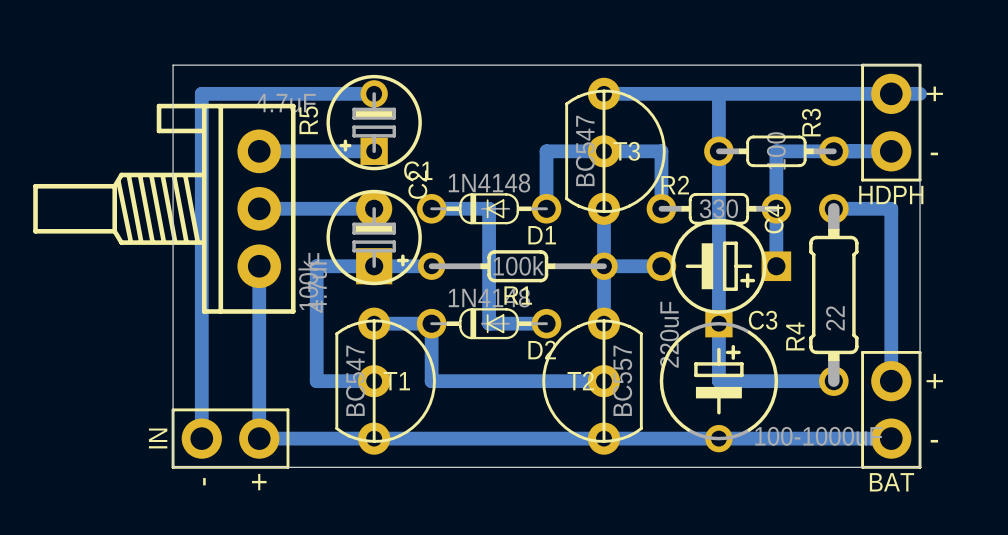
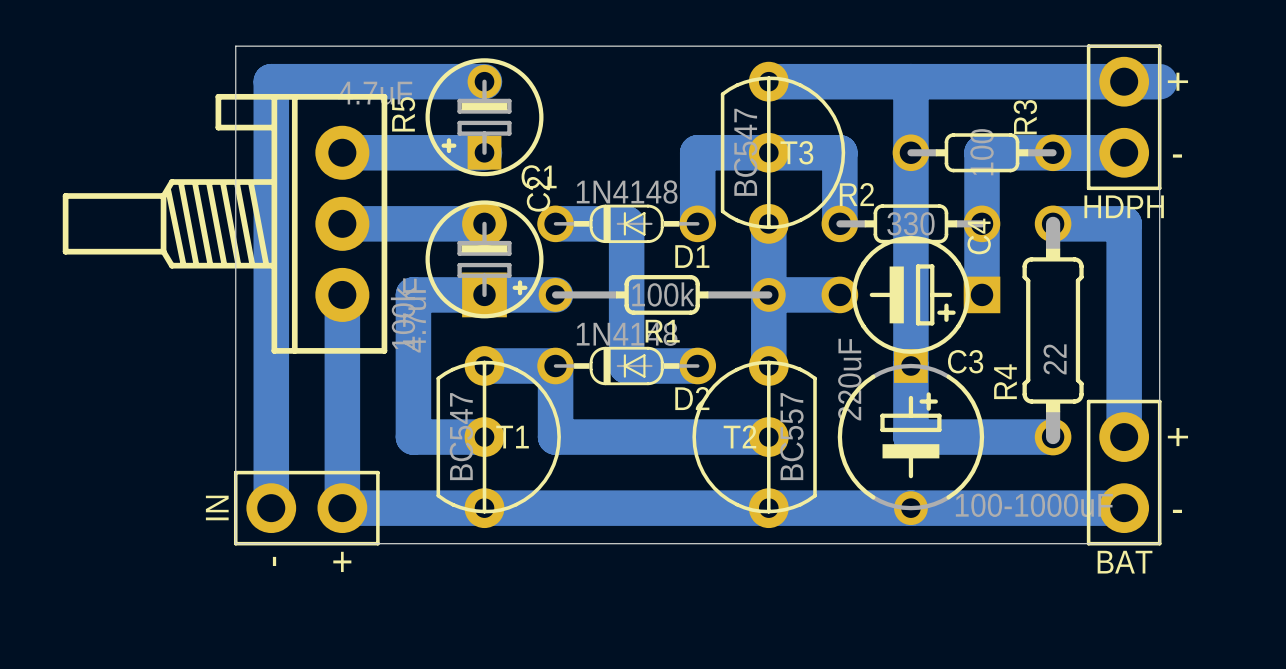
bottom track width: thin (374, 93) (201, 93) (201, 438) -> thick (484, 81) (271, 81) (271, 508)
bottom track width: thin (604, 93) (920, 93) -> thick (768, 81) (1159, 81)
bottom track width: thin (718, 93) (718, 381) (833, 381) -> thick (910, 81) (910, 437) (1053, 437)
bottom track width: thin (259, 151) (374, 151) -> thick (342, 152) (484, 152)
bottom track width: thin (891, 151) (776, 151) (776, 266) -> thick (1124, 152) (982, 152) (982, 294)
bottom track width: thin (259, 208) (374, 208) -> thick (342, 223) (484, 223)
bottom track width: thin (431, 208) (489, 208) (489, 323) (546, 323) -> thick (555, 223) (626, 223) (626, 365) (697, 365)
bottom track width: thin (546, 208) (546, 151) (661, 151) (661, 208) -> thick (697, 223) (697, 152) (839, 152) (839, 223)
bottom track width: thin (604, 208) (604, 323) -> thick (768, 223) (768, 365)
bottom track width: thin (833, 208) (891, 208) (891, 381) -> thick (1053, 223) (1124, 223) (1124, 437)
bottom track width: thin (259, 266) (259, 438) (891, 438) -> thick (342, 294) (342, 508) (1124, 508)
bottom track width: thin (431, 266) (316, 266) (316, 381) (374, 381) -> thick (555, 294) (413, 294) (413, 437) (484, 437)
bottom track width: thin (604, 266) (661, 266) -> thick (768, 294) (839, 294)
bottom track width: thin (374, 323) (431, 323) (431, 381) (604, 381) -> thick (484, 365) (555, 365) (555, 437) (768, 437)

